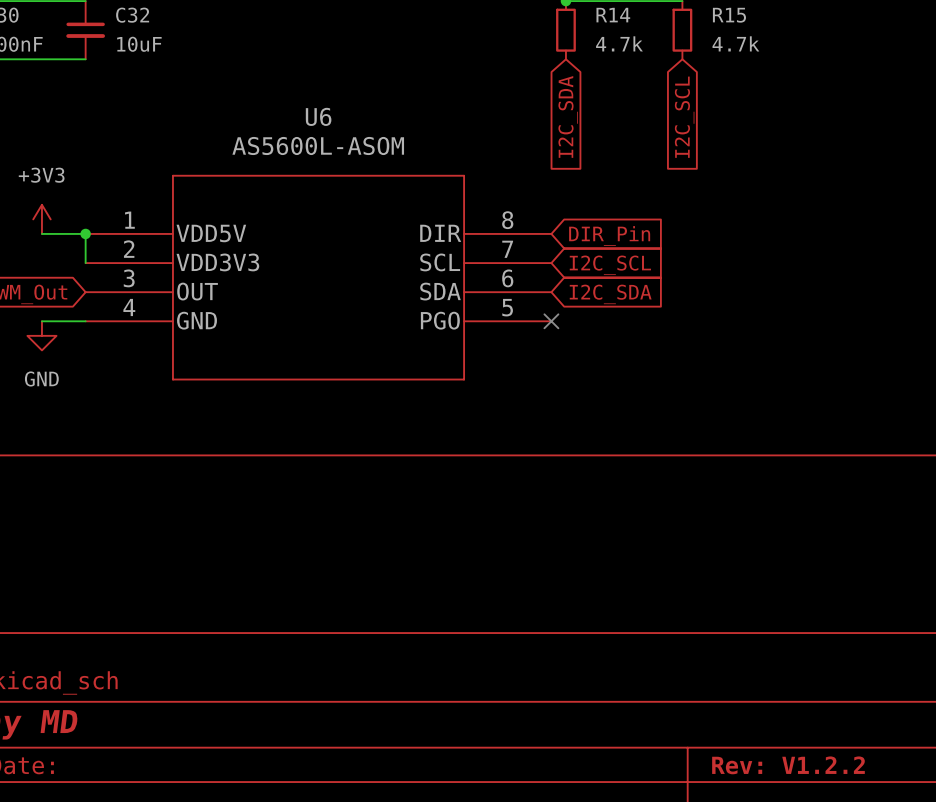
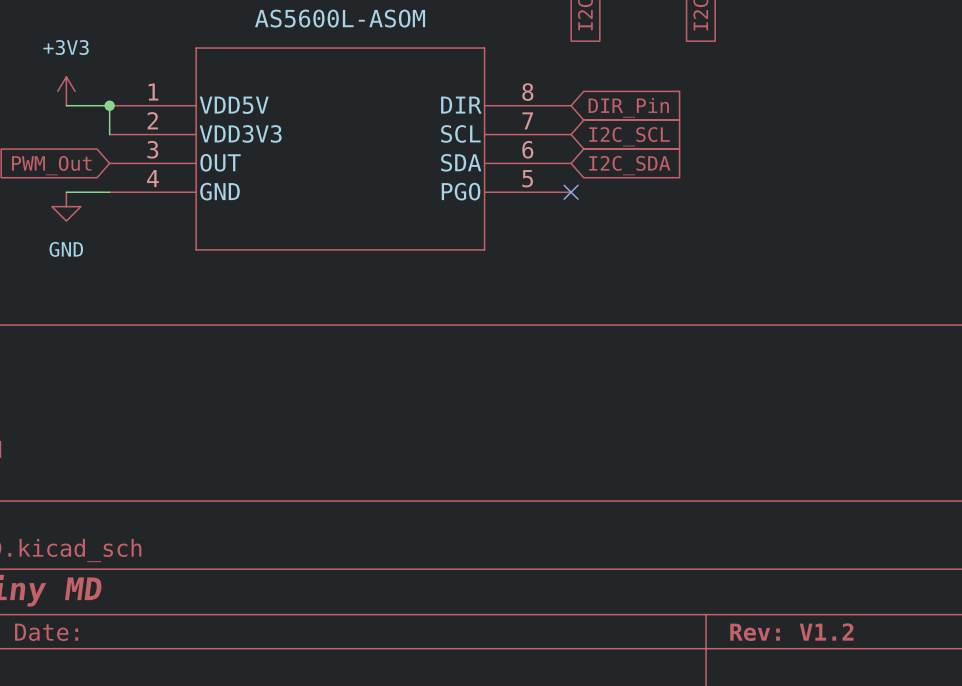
title block: Rev: V1.2.2 (788, 765) -> Rev: V1.2 (791, 632)

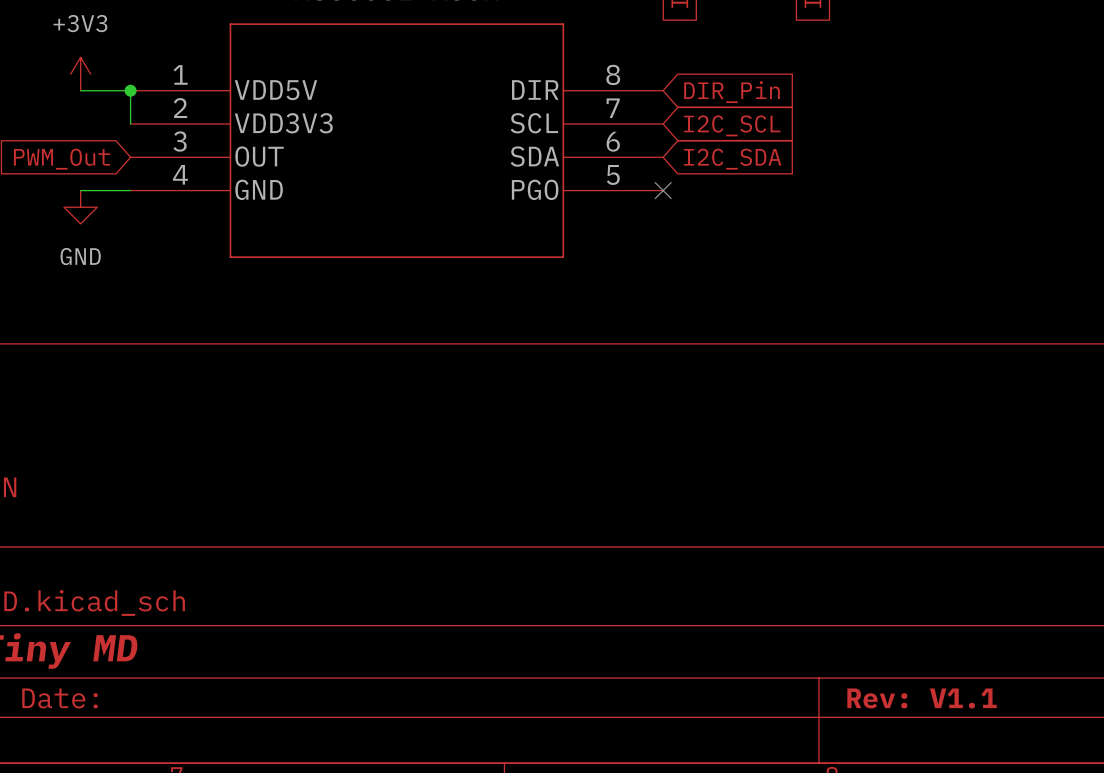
title block: Rev: V1.2 (791, 632) -> Rev: V1.1 (922, 698)

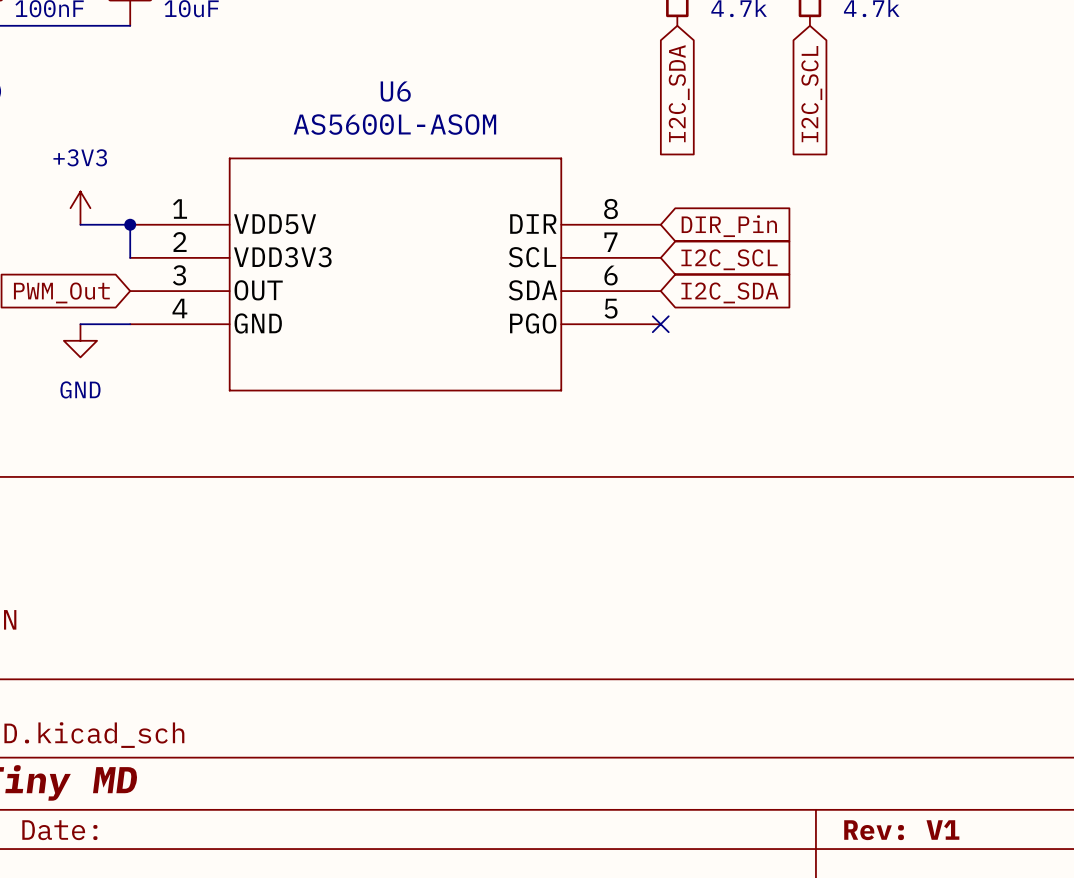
title block: Rev: V1.1 (922, 698) -> Rev: V1 (901, 830)

